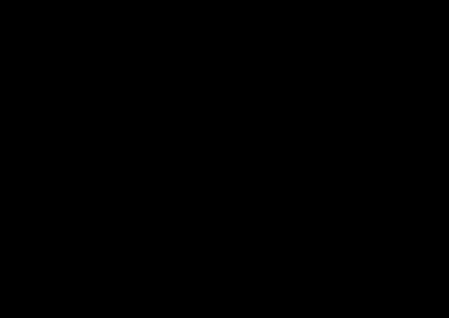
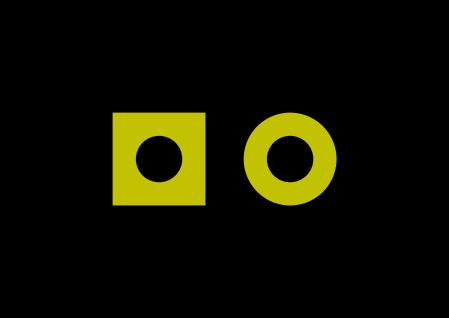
part: none -> (224, 159)

